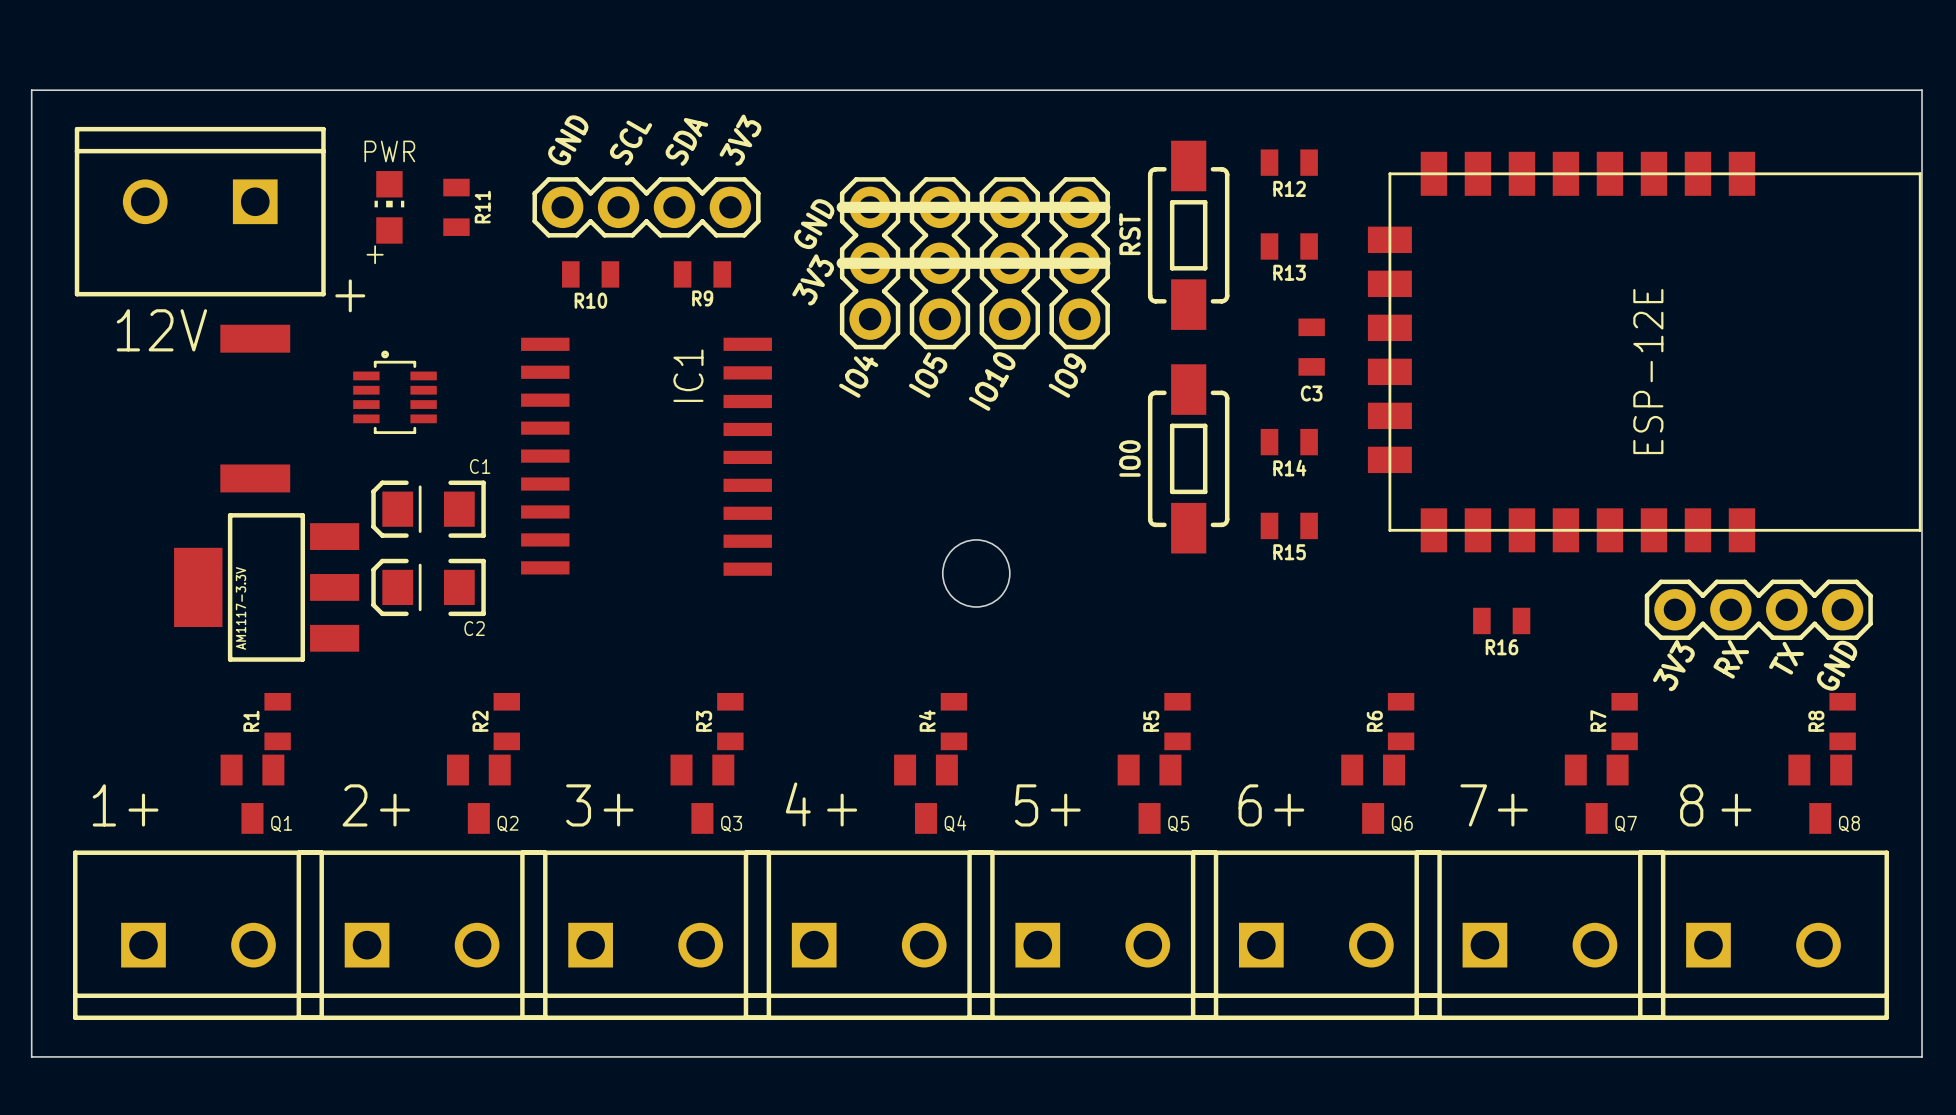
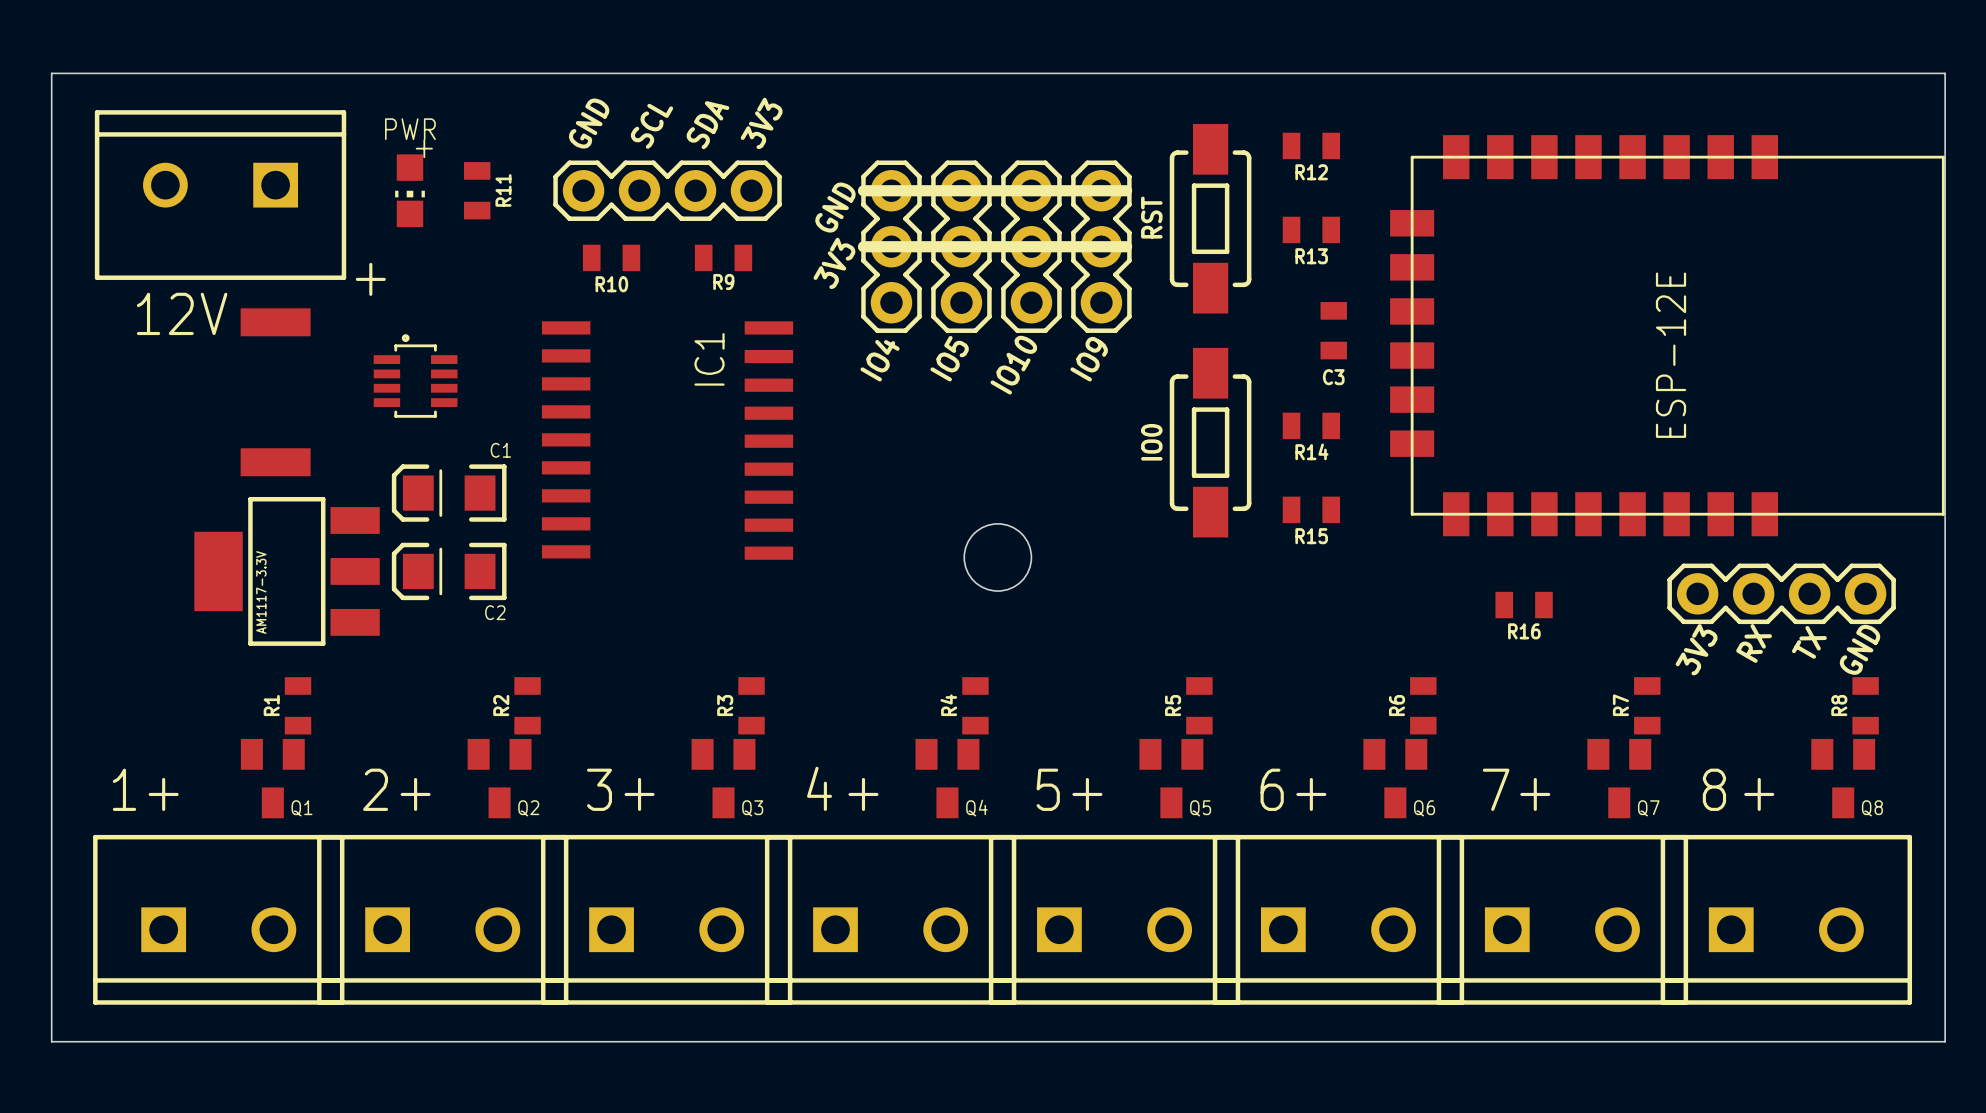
PWR footprint: [374, 171, 405, 244] -> [395, 154, 425, 228]

